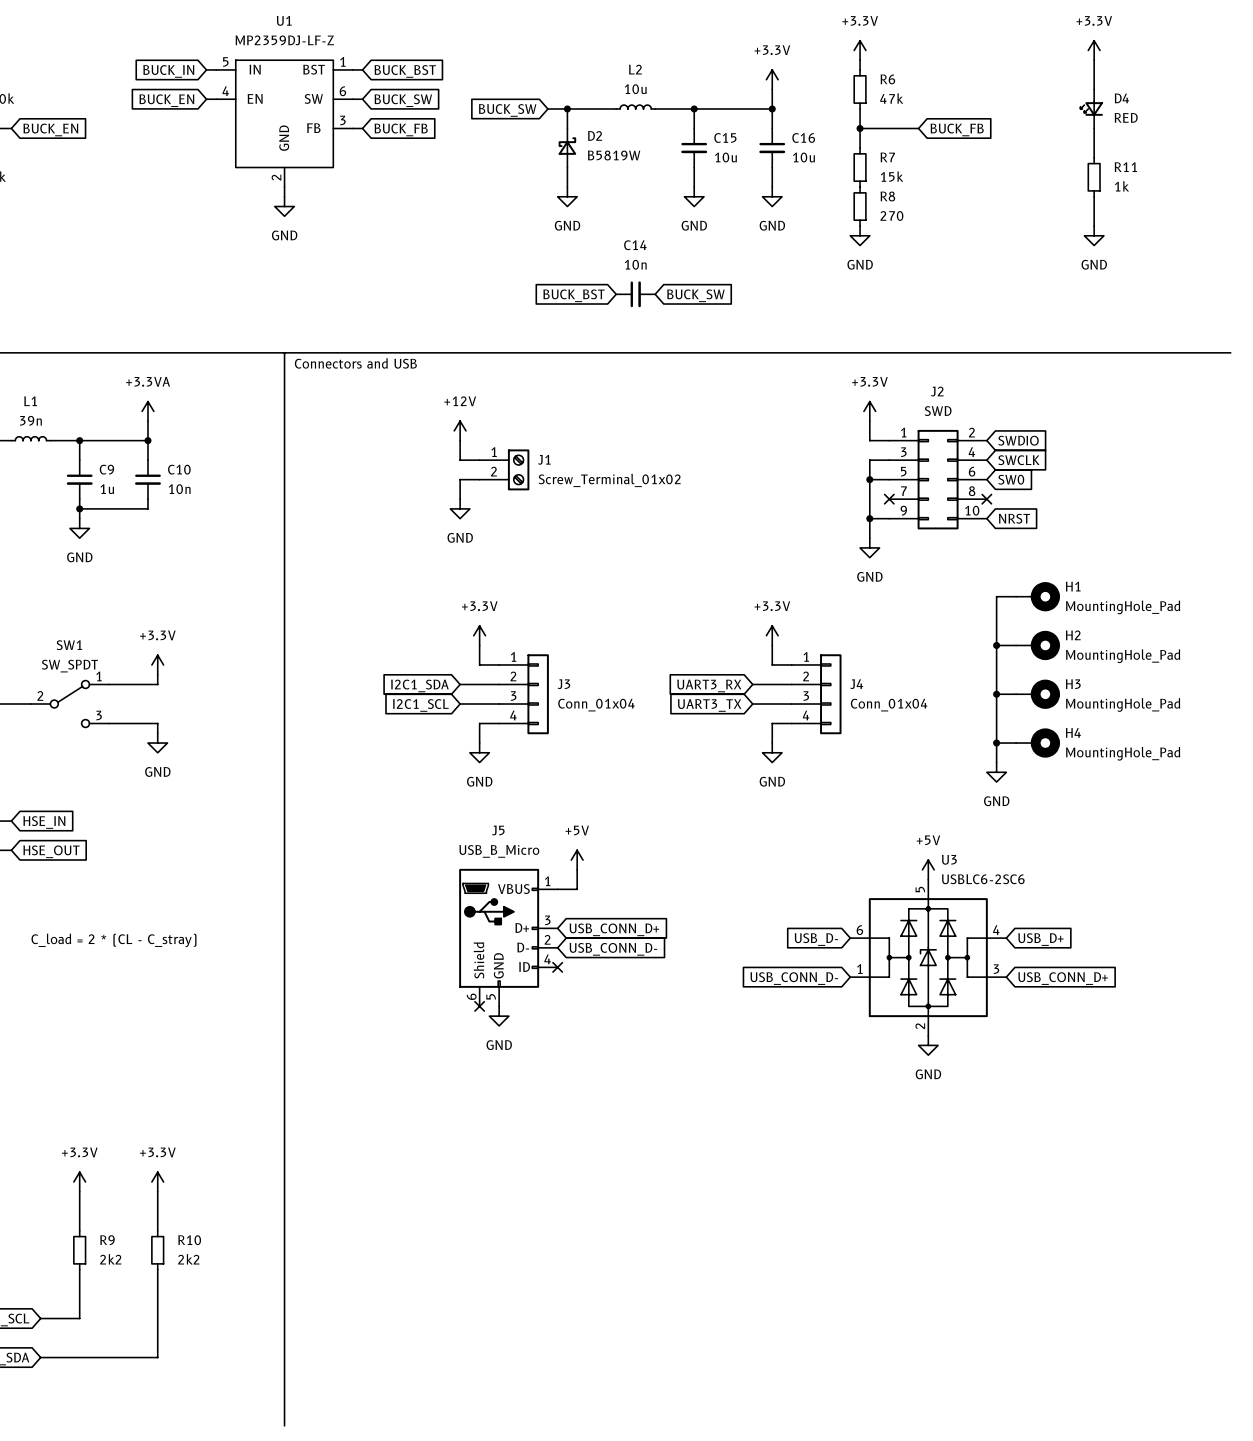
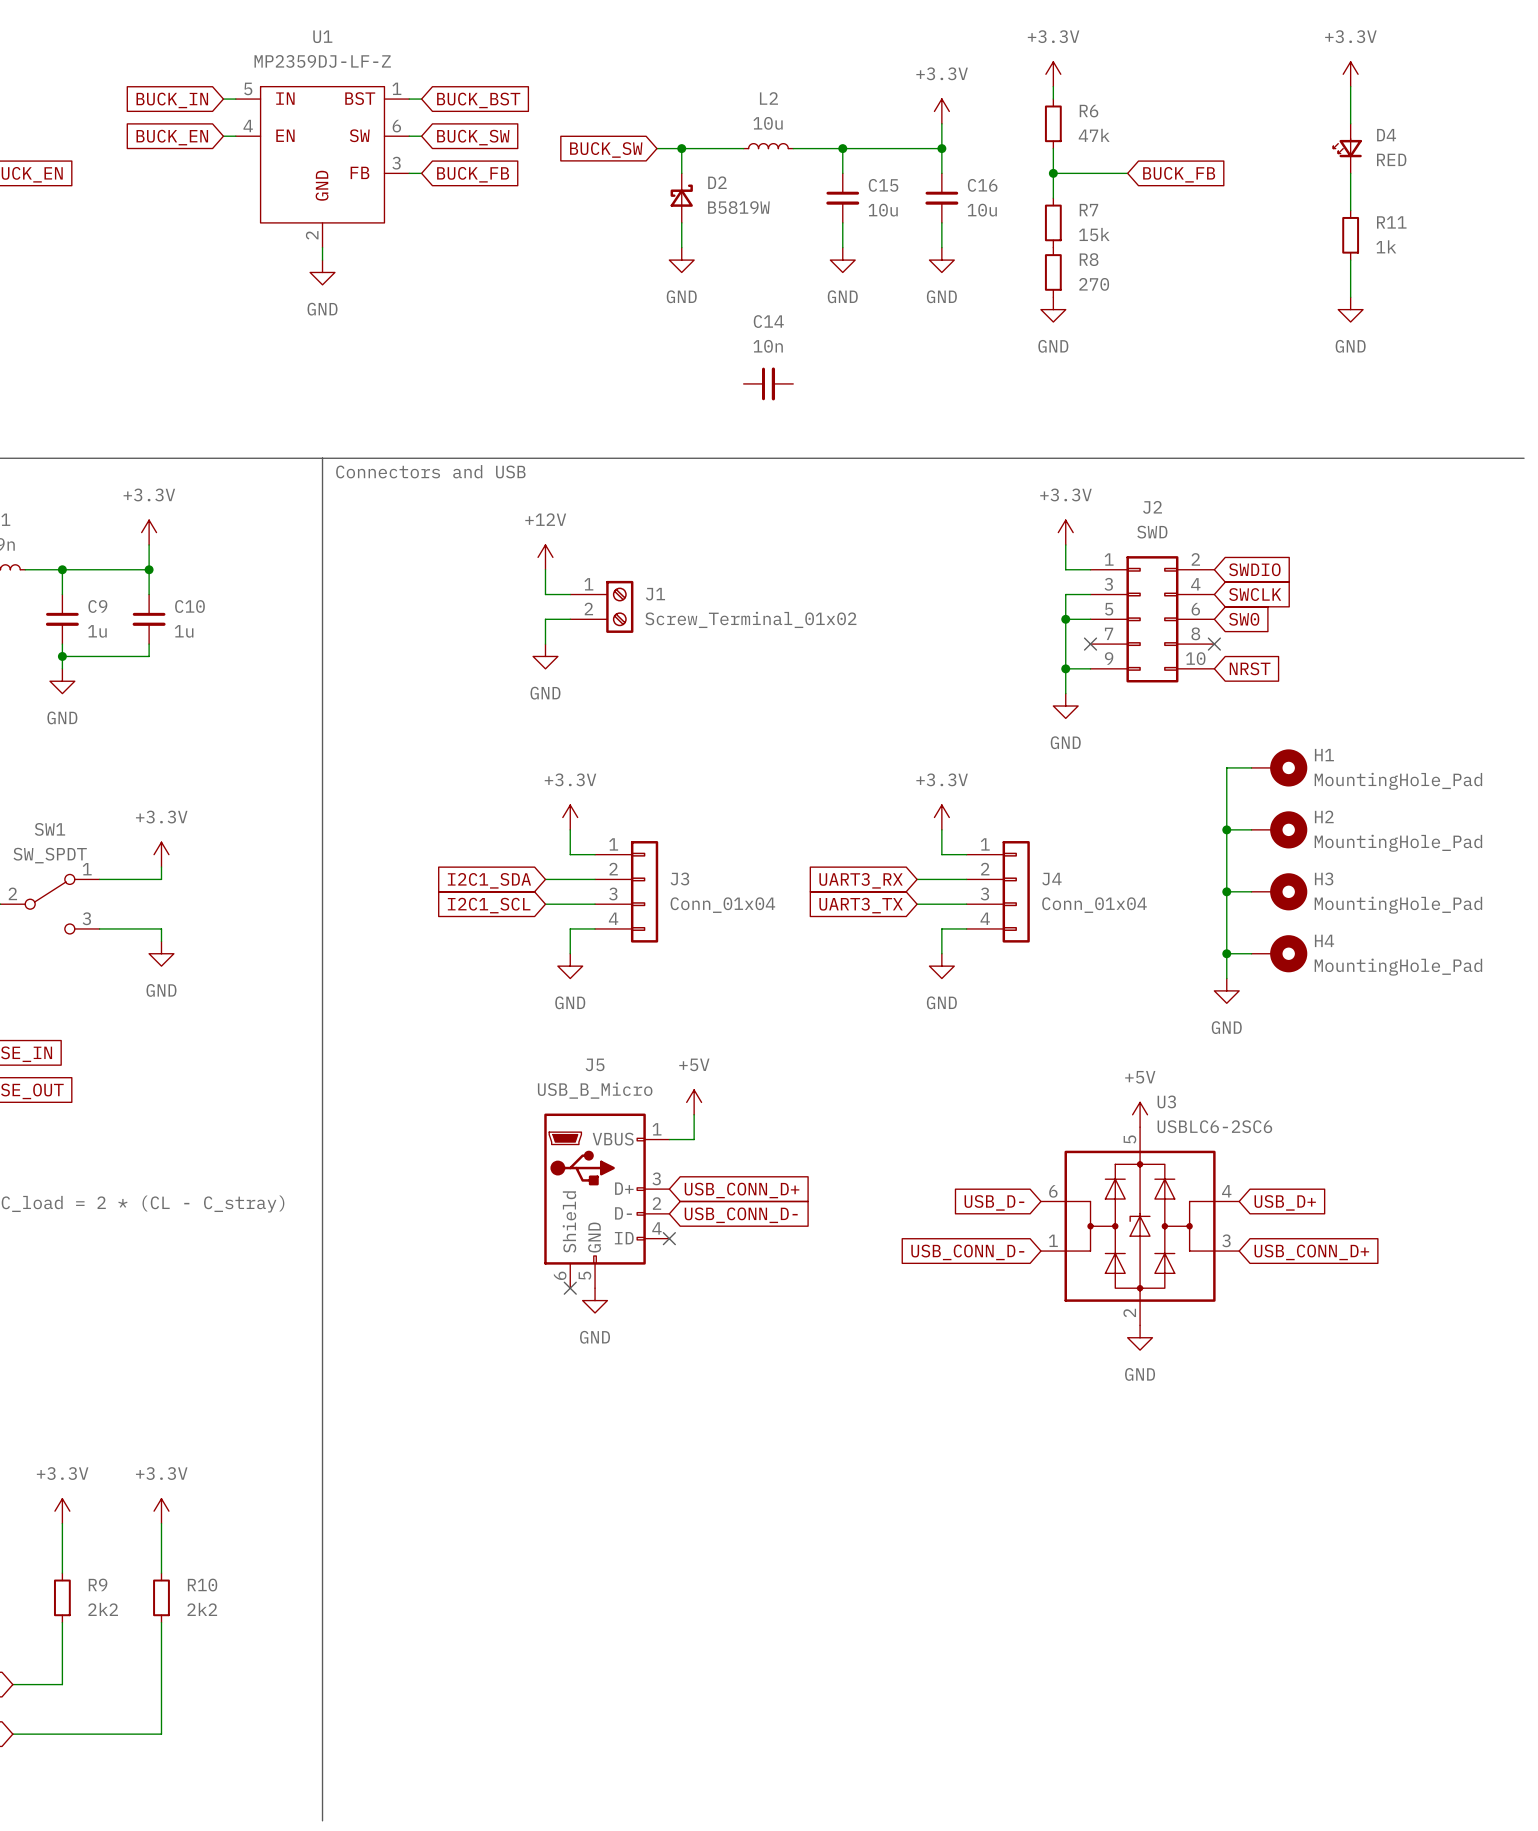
global label: BUCK_BST (574, 295) -> none
global label: BUCK_SW (695, 295) -> none
power symbol: +3.3VA (147, 411) -> +3.3V (149, 532)
C10 value: 10n (179, 489) -> 1u (184, 631)

